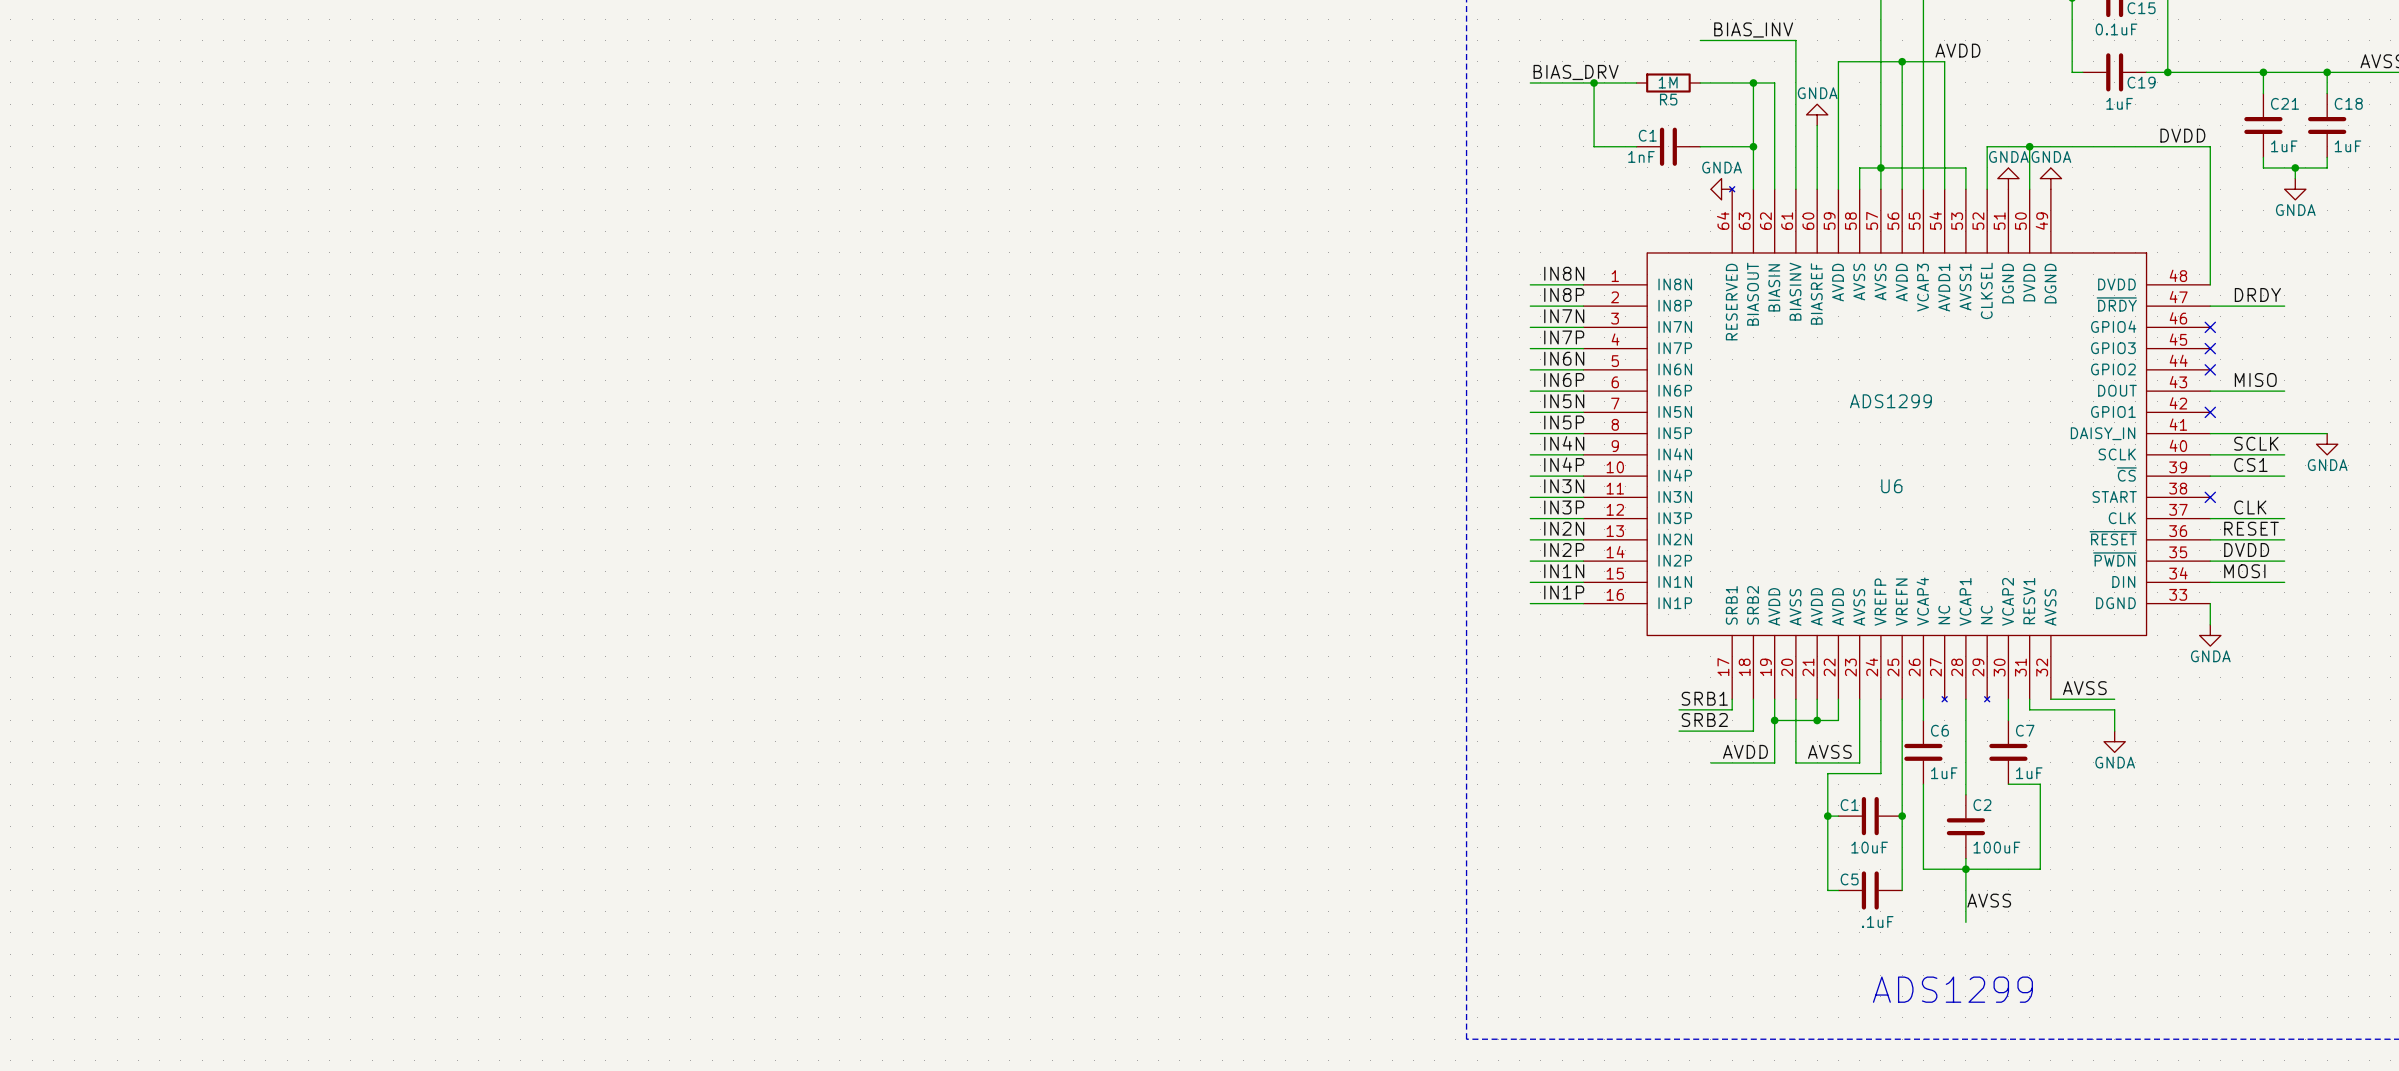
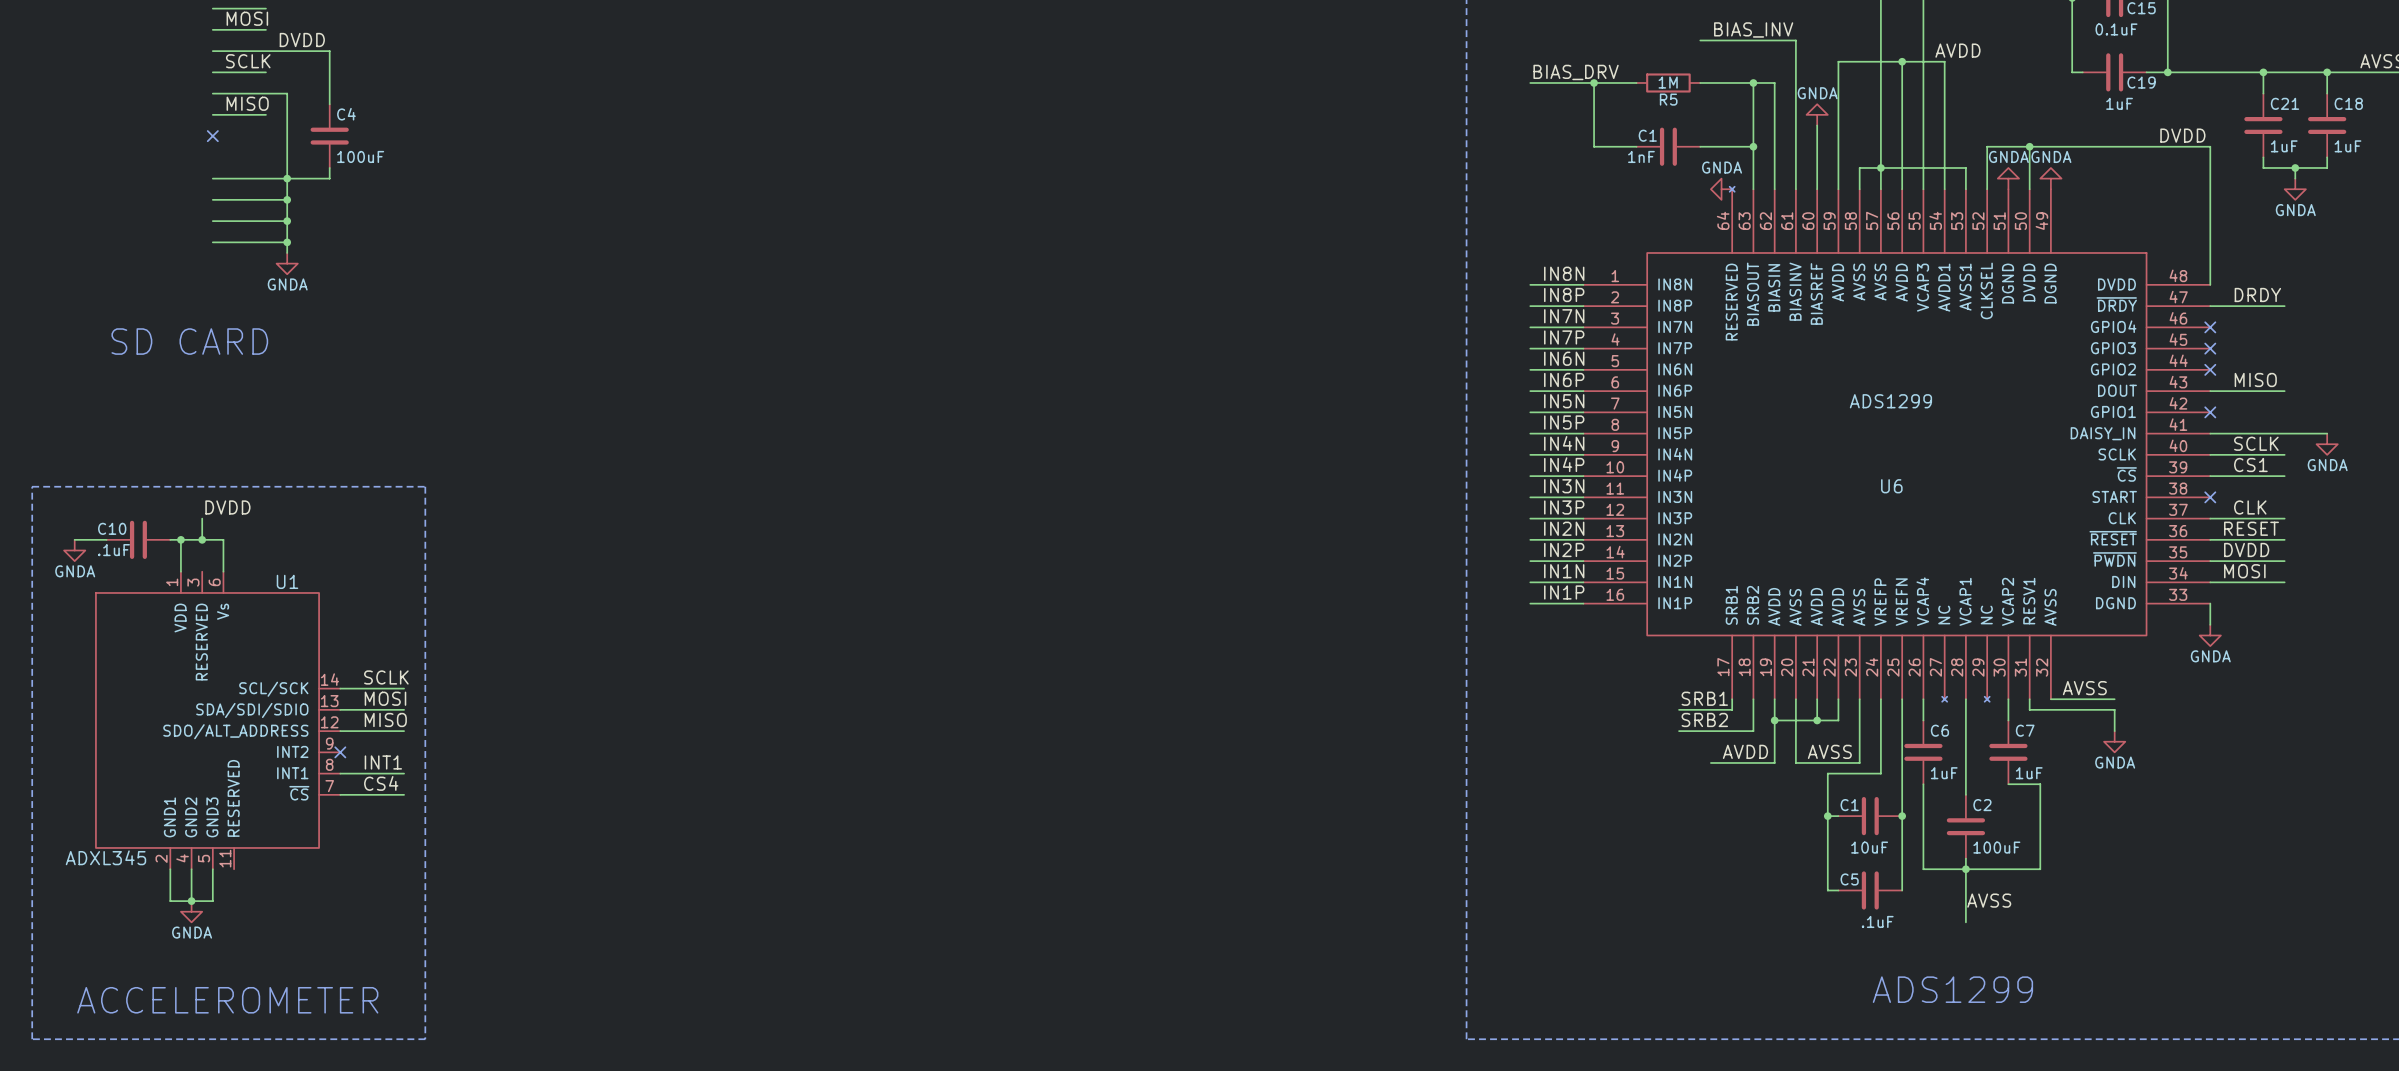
wire: none -> (212, 8) (265, 8)
label: none -> MOSI (247, 18)
wire: none -> (212, 29) (265, 29)
label: none -> DVDD (302, 39)
wire: none -> (212, 51) (329, 51) (329, 104)
label: none -> SCLK (248, 61)
wire: none -> (212, 72) (265, 72)
wire: none -> (212, 93) (287, 93) (287, 252)
label: none -> MISO (247, 103)
wire: none -> (212, 114) (265, 114)
no-connect mark: none -> (212, 136)
C4: none -> 100uF (329, 136)
wire: none -> (329, 167) (329, 178) (212, 178)
junction: none -> (287, 178)
wire: none -> (212, 199) (287, 199)
junction: none -> (287, 199)
wire: none -> (212, 221) (287, 221)
junction: none -> (287, 221)
wire: none -> (212, 242) (287, 242)
junction: none -> (287, 242)
power symbol: none -> GNDA (287, 263)
text: none -> SD CARD (189, 341)
line: none -> (32, 486) (425, 486) (425, 1039) (32, 1039) (32, 486)
label: none -> DVDD (227, 507)
wire: none -> (202, 518) (202, 539)
wire: none -> (74, 539) (106, 539)
C10: none -> .1uF (138, 539)
wire: none -> (170, 539) (223, 539) (223, 571)
wire: none -> (180, 539) (180, 571)
junction: none -> (180, 539)
junction: none -> (202, 539)
power symbol: none -> GNDA (74, 550)
label: none -> SCLK (386, 677)
wire: none -> (340, 688) (404, 688)
label: none -> MOSI (385, 698)
wire: none -> (340, 709) (404, 709)
label: none -> MISO (385, 719)
U1: none -> ADXL345 (218, 720)
wire: none -> (340, 731) (404, 731)
no-connect mark: none -> (340, 752)
label: none -> INT1 (383, 762)
wire: none -> (340, 773) (404, 773)
label: none -> CS4 (381, 783)
wire: none -> (340, 794) (404, 794)
wire: none -> (170, 869) (170, 901) (212, 901) (212, 869)
wire: none -> (191, 869) (191, 901)
junction: none -> (191, 901)
power symbol: none -> GNDA (191, 911)
text: none -> ACCELEROMETER (227, 1000)

